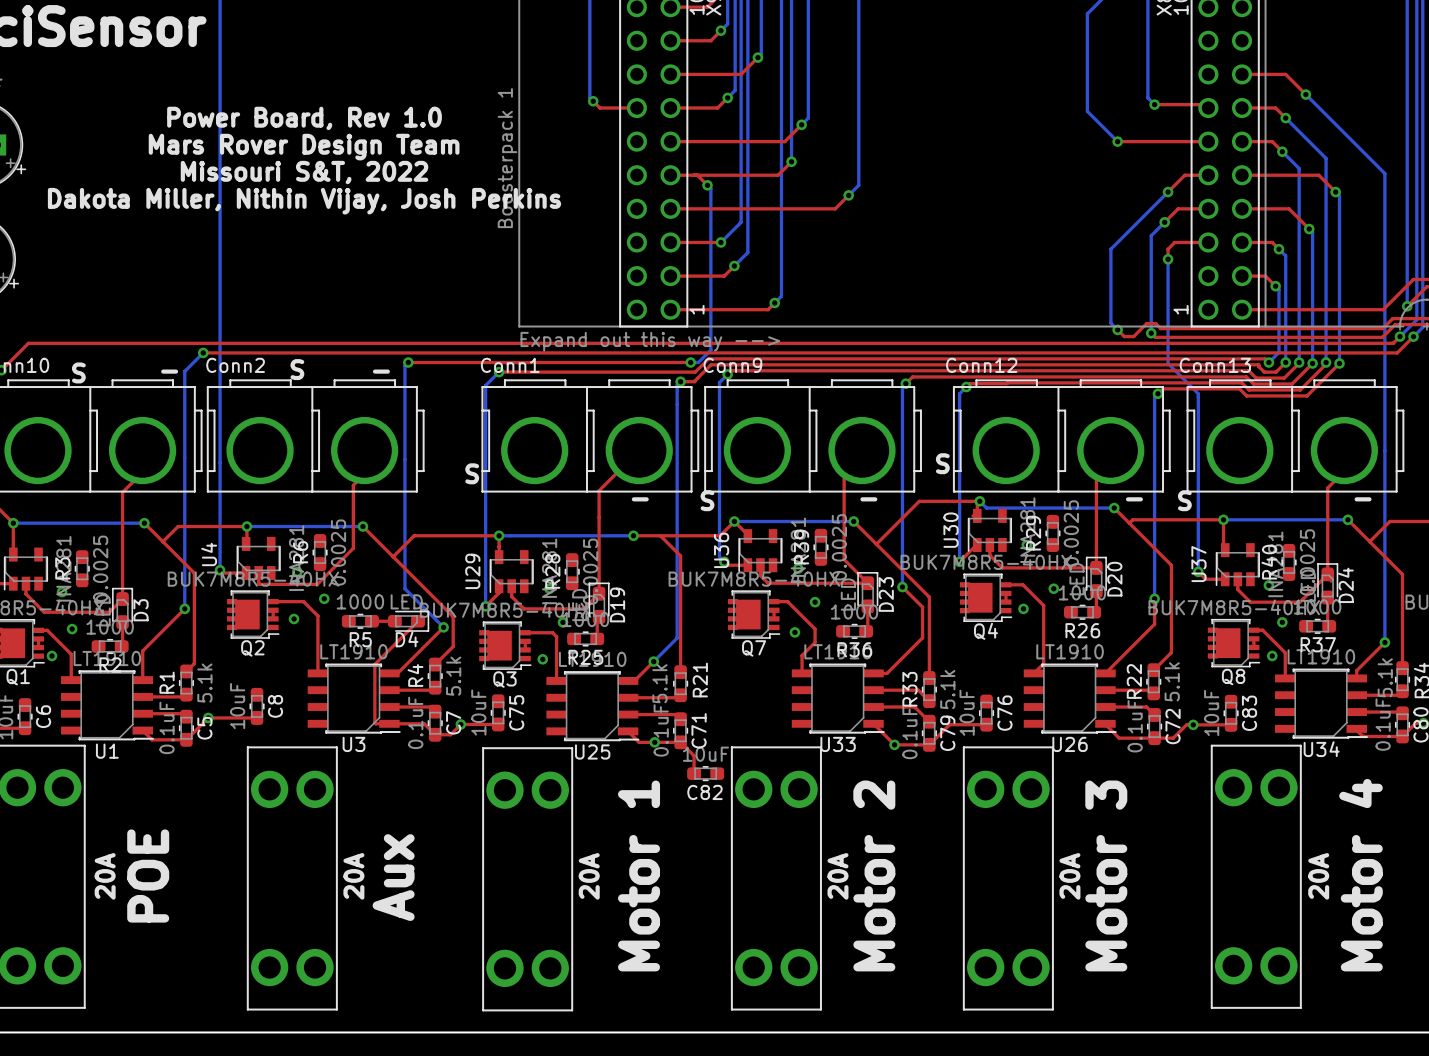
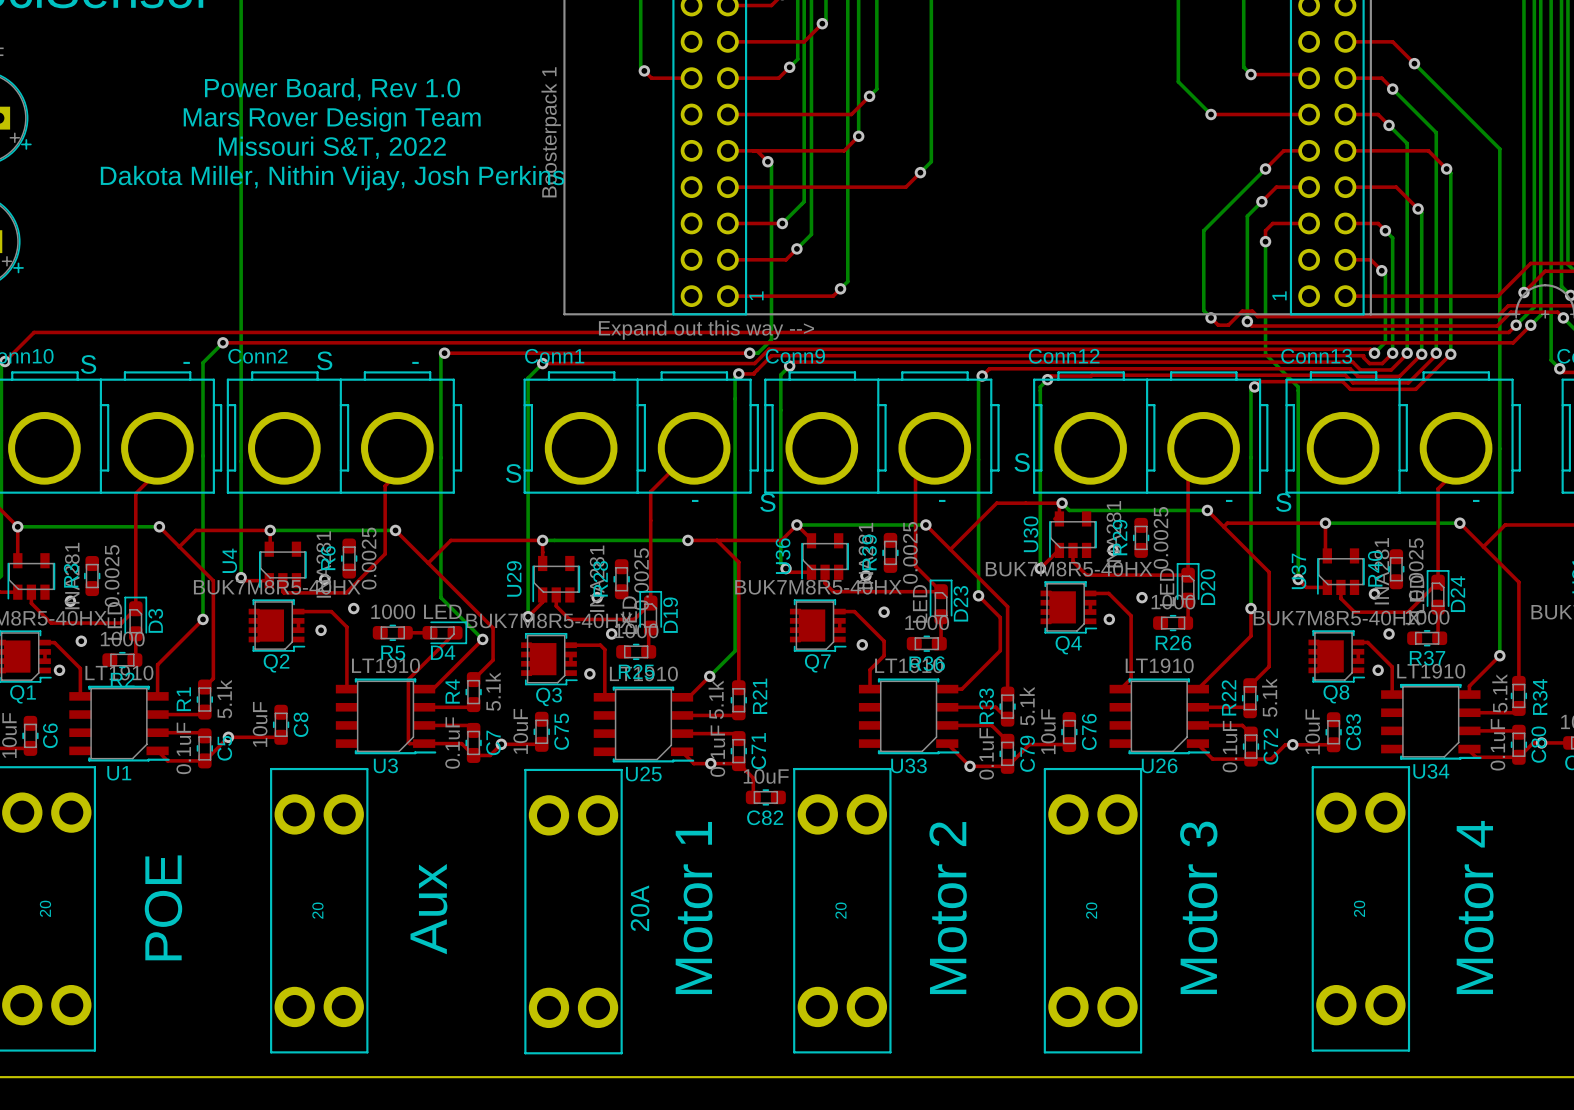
part value: 20A (105, 876) -> 20 (45, 908)
part value: 20A (353, 876) -> 20 (317, 910)
part value: 20A (837, 876) -> 20 (841, 910)
part value: 20A (1069, 876) -> 20 (1091, 910)
part value: 20A (1318, 876) -> 20 (1359, 908)

